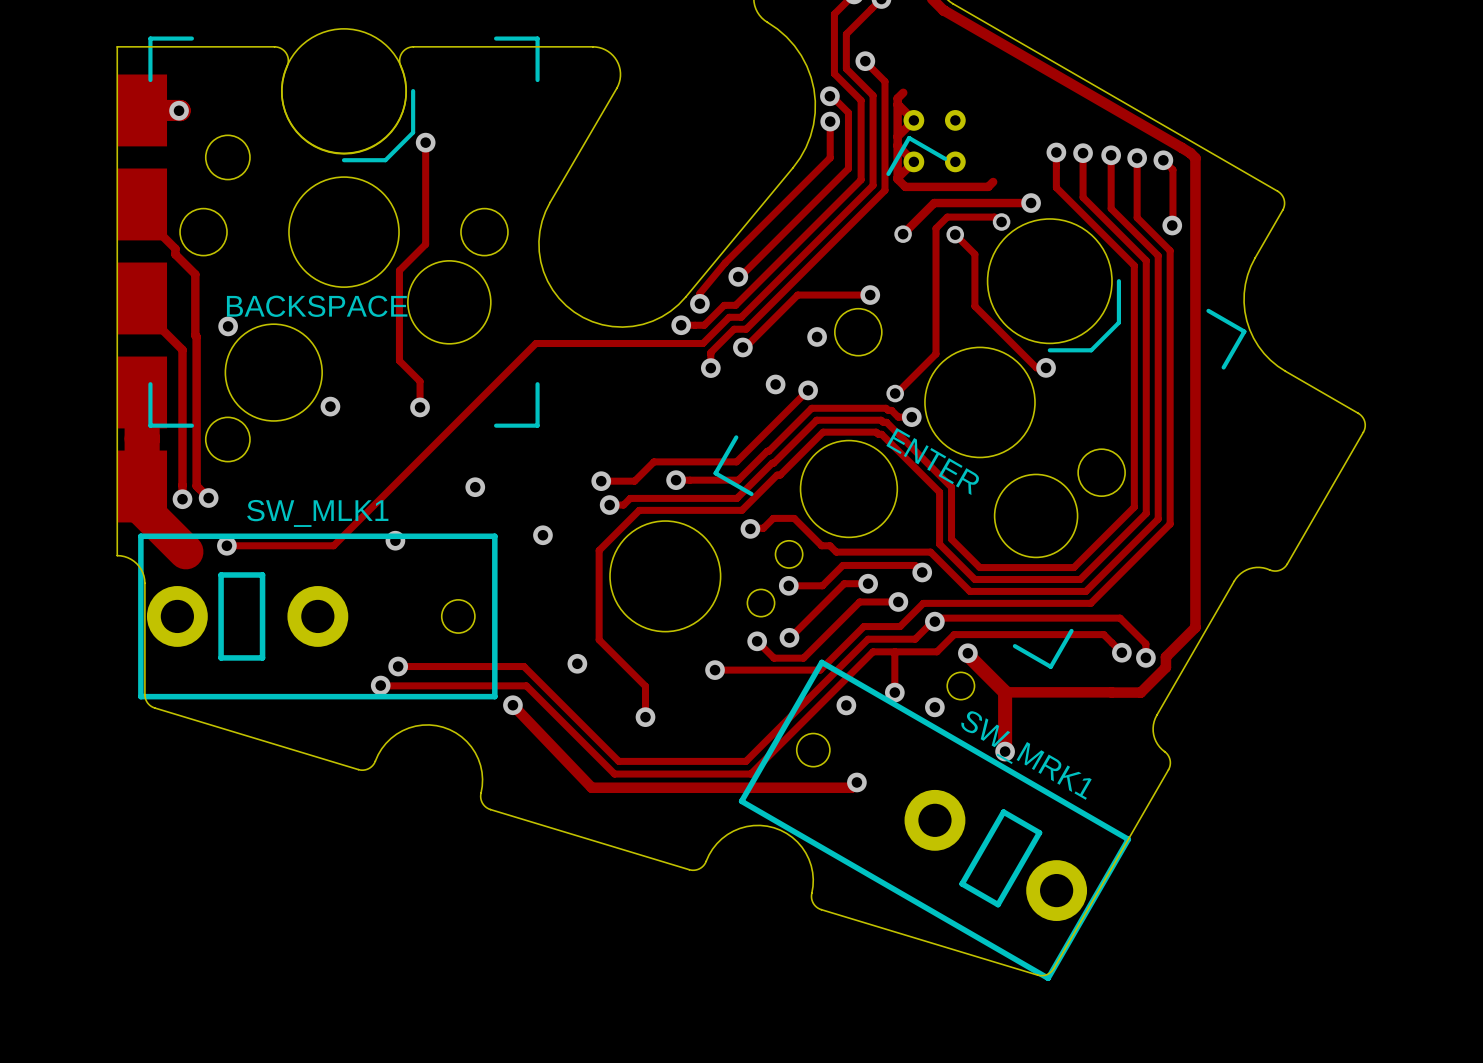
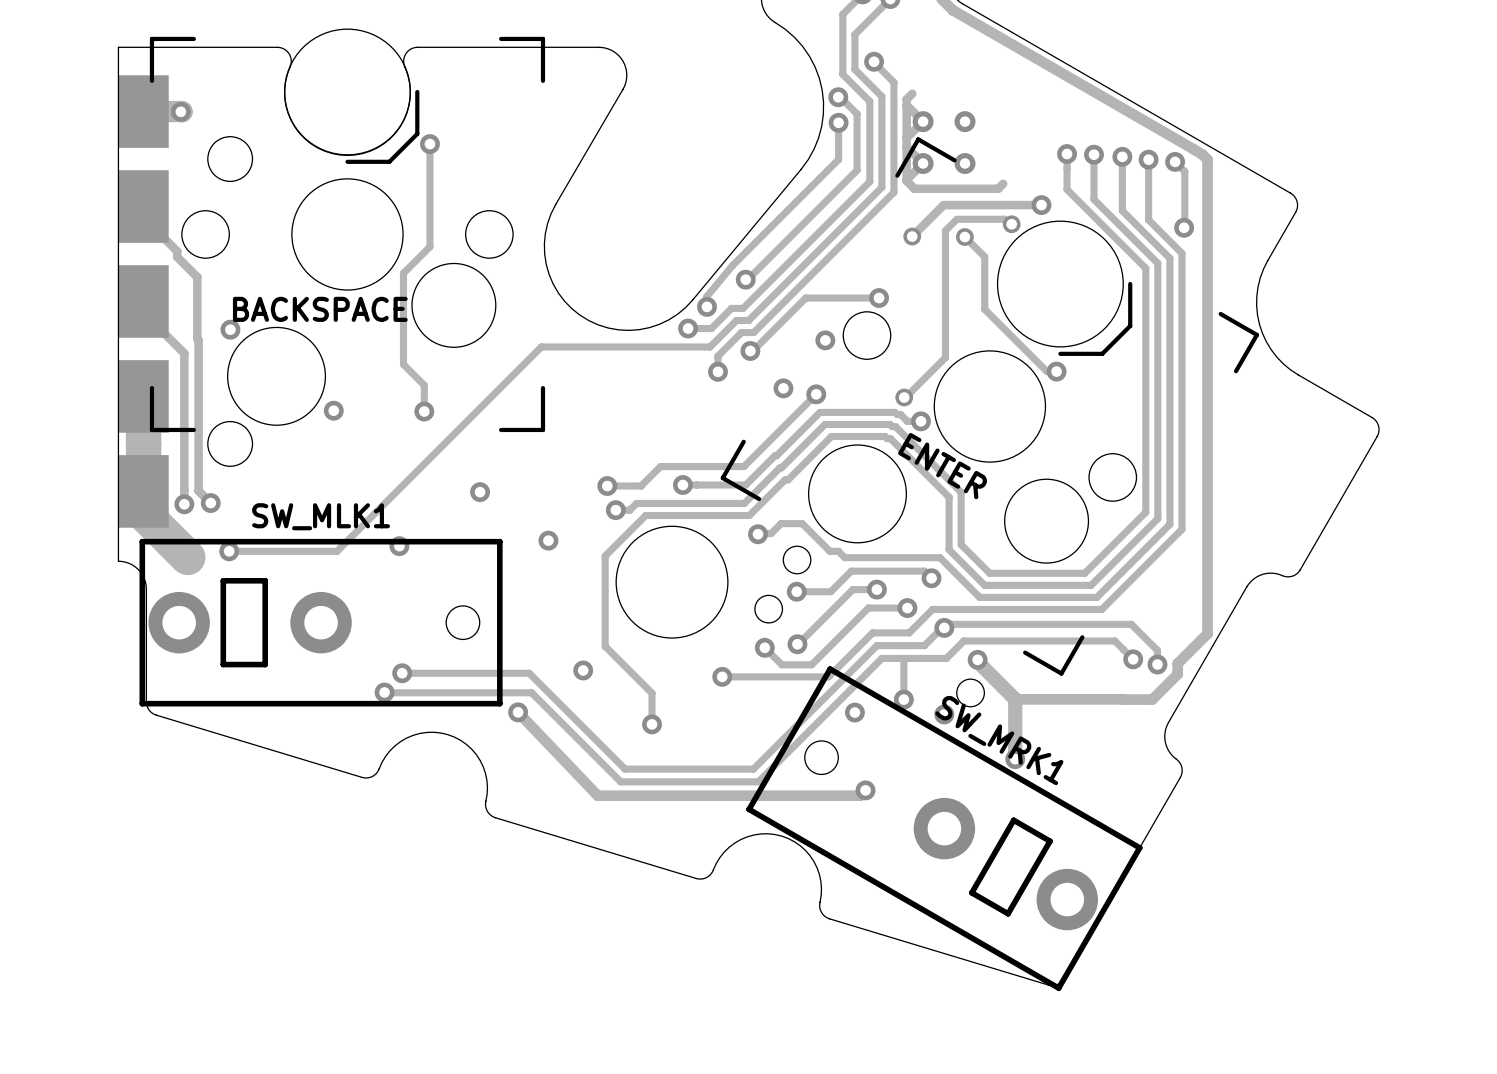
SW_MRK1 name position: SW_MRK1 (1025, 755) -> SW_MRK1 (999, 740)

